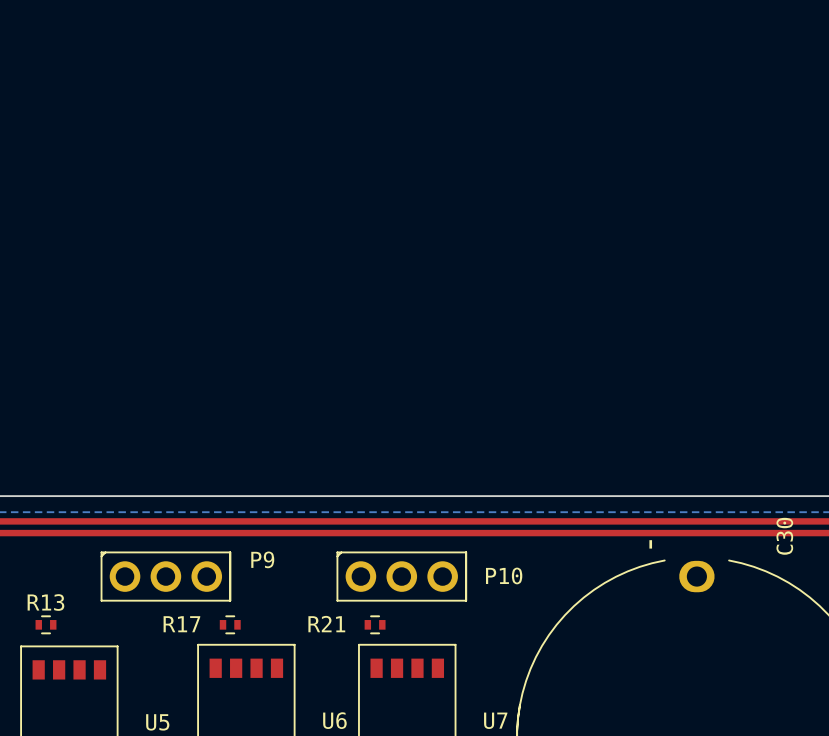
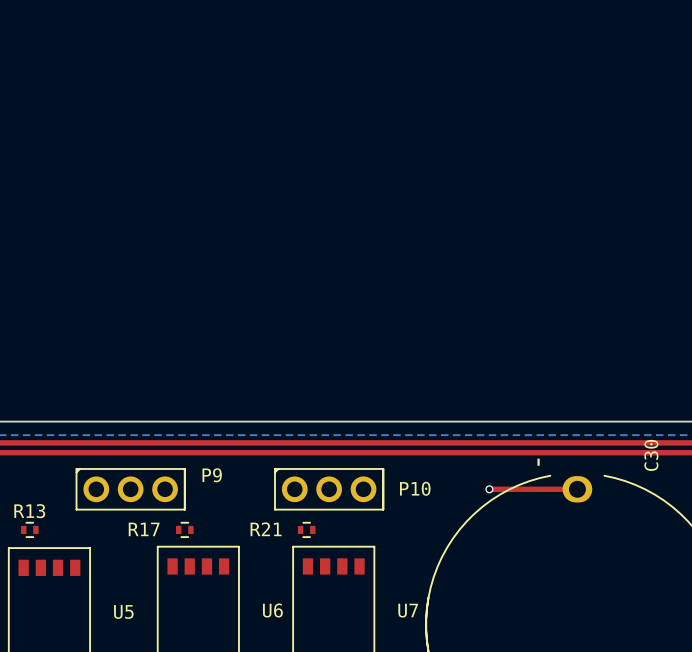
top track: none -> (489, 489) (577, 489)
via: none -> (489, 489)

